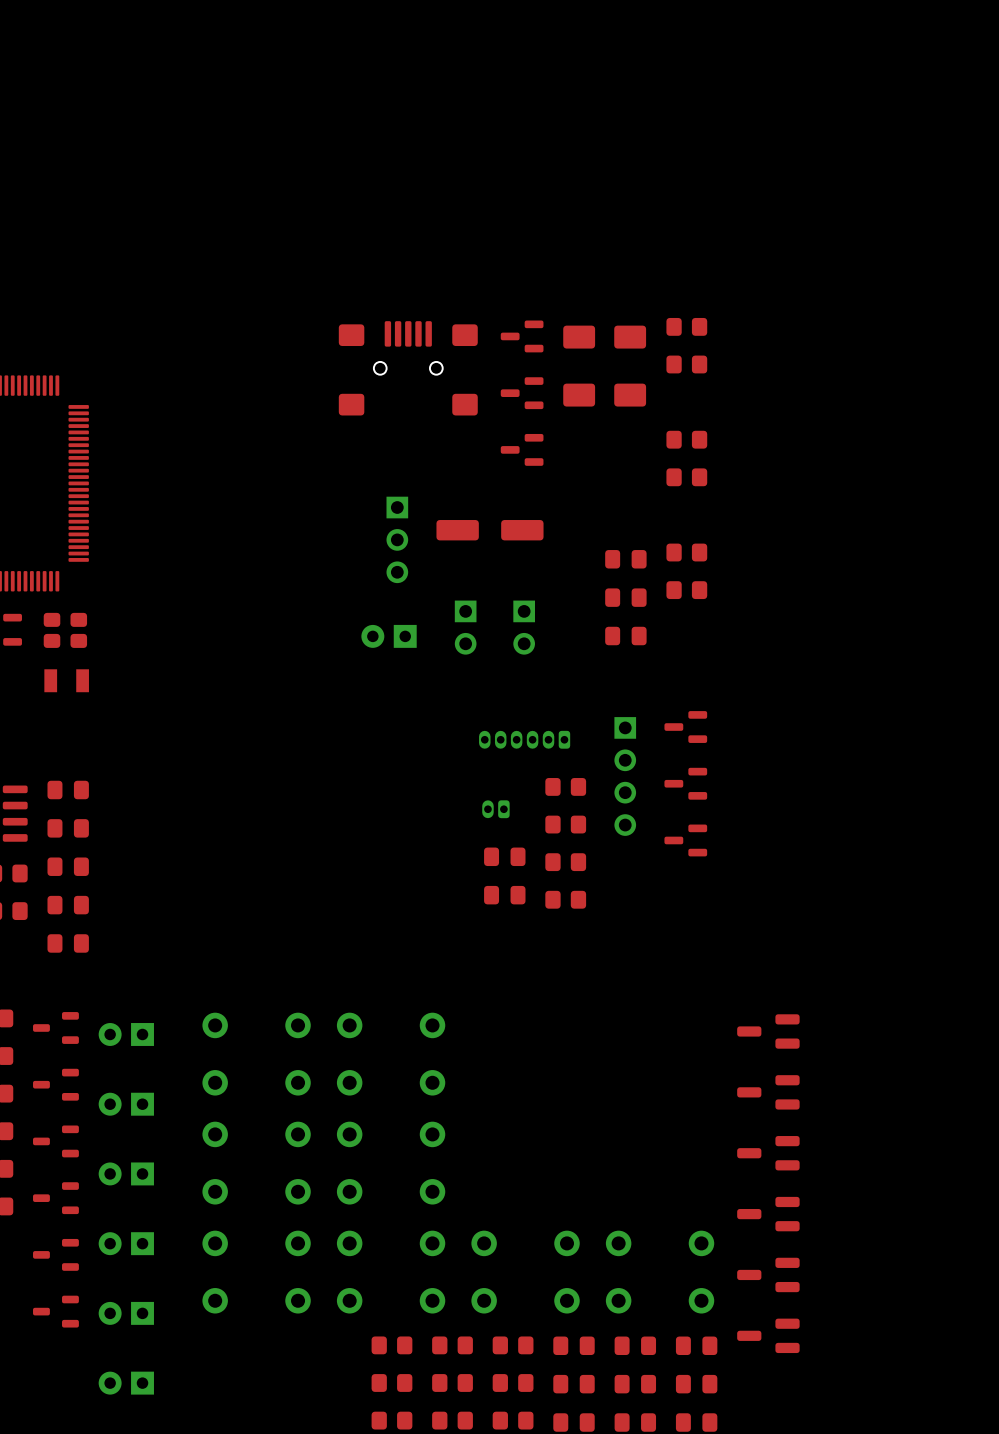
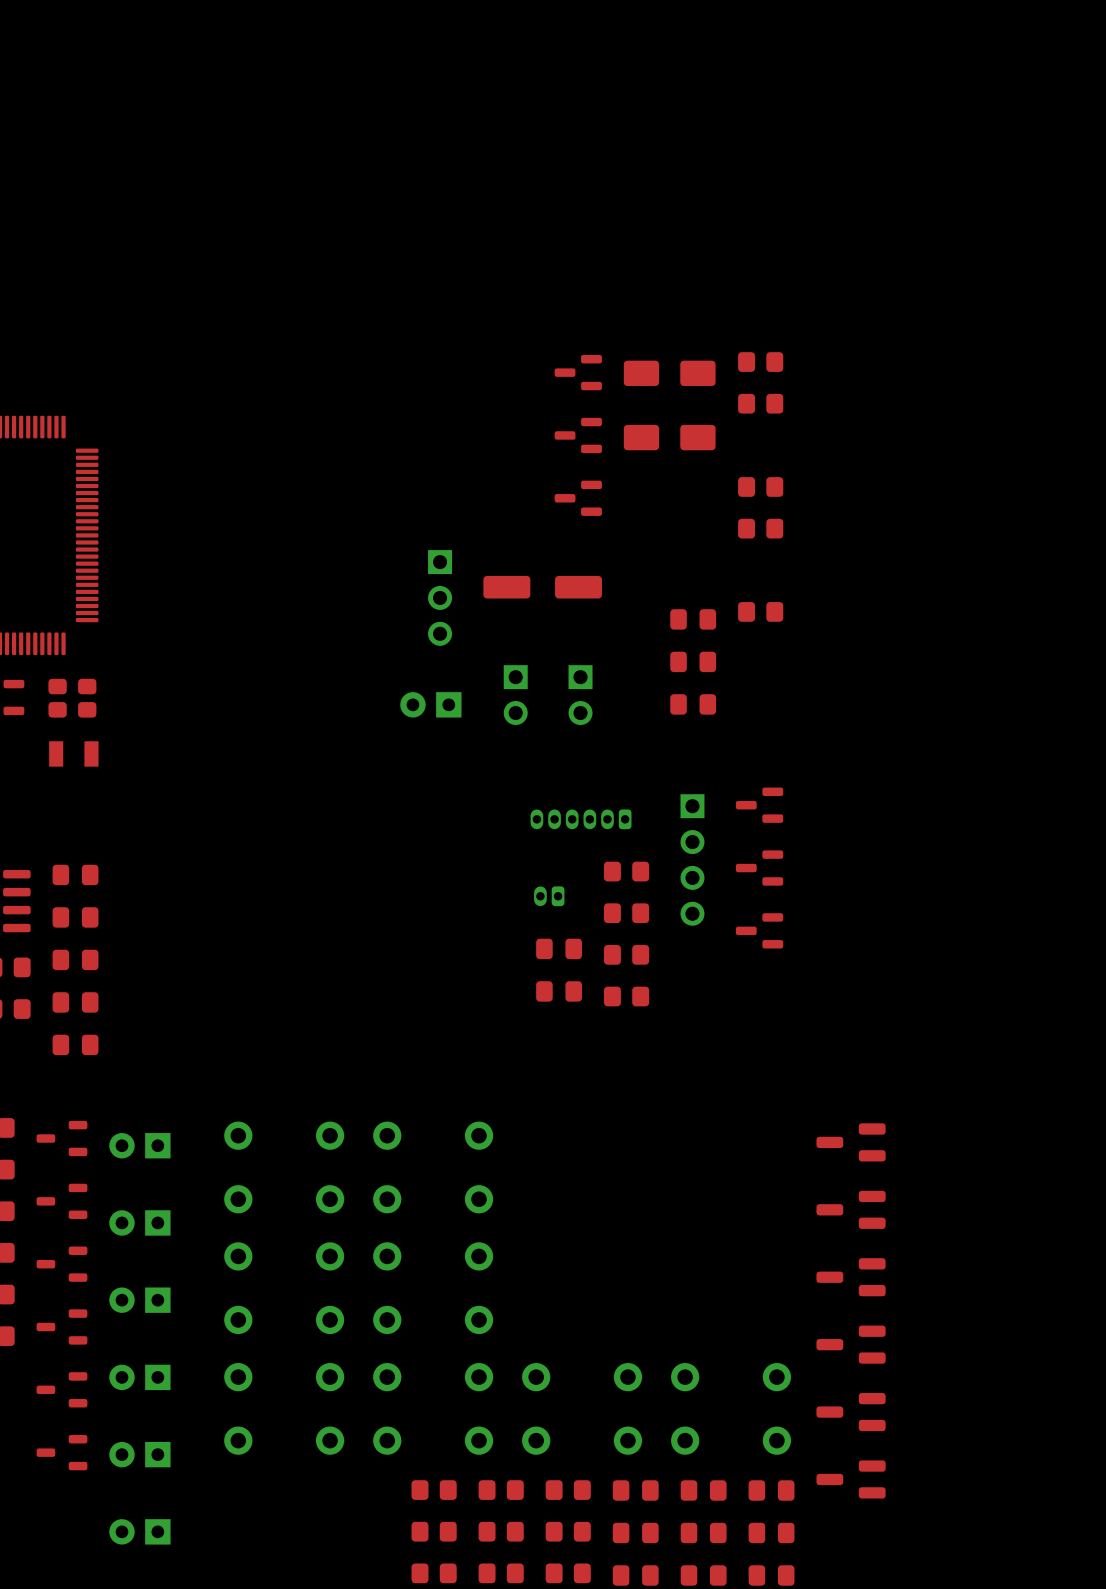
part: (408, 368) -> none
part: (686, 590) -> none

